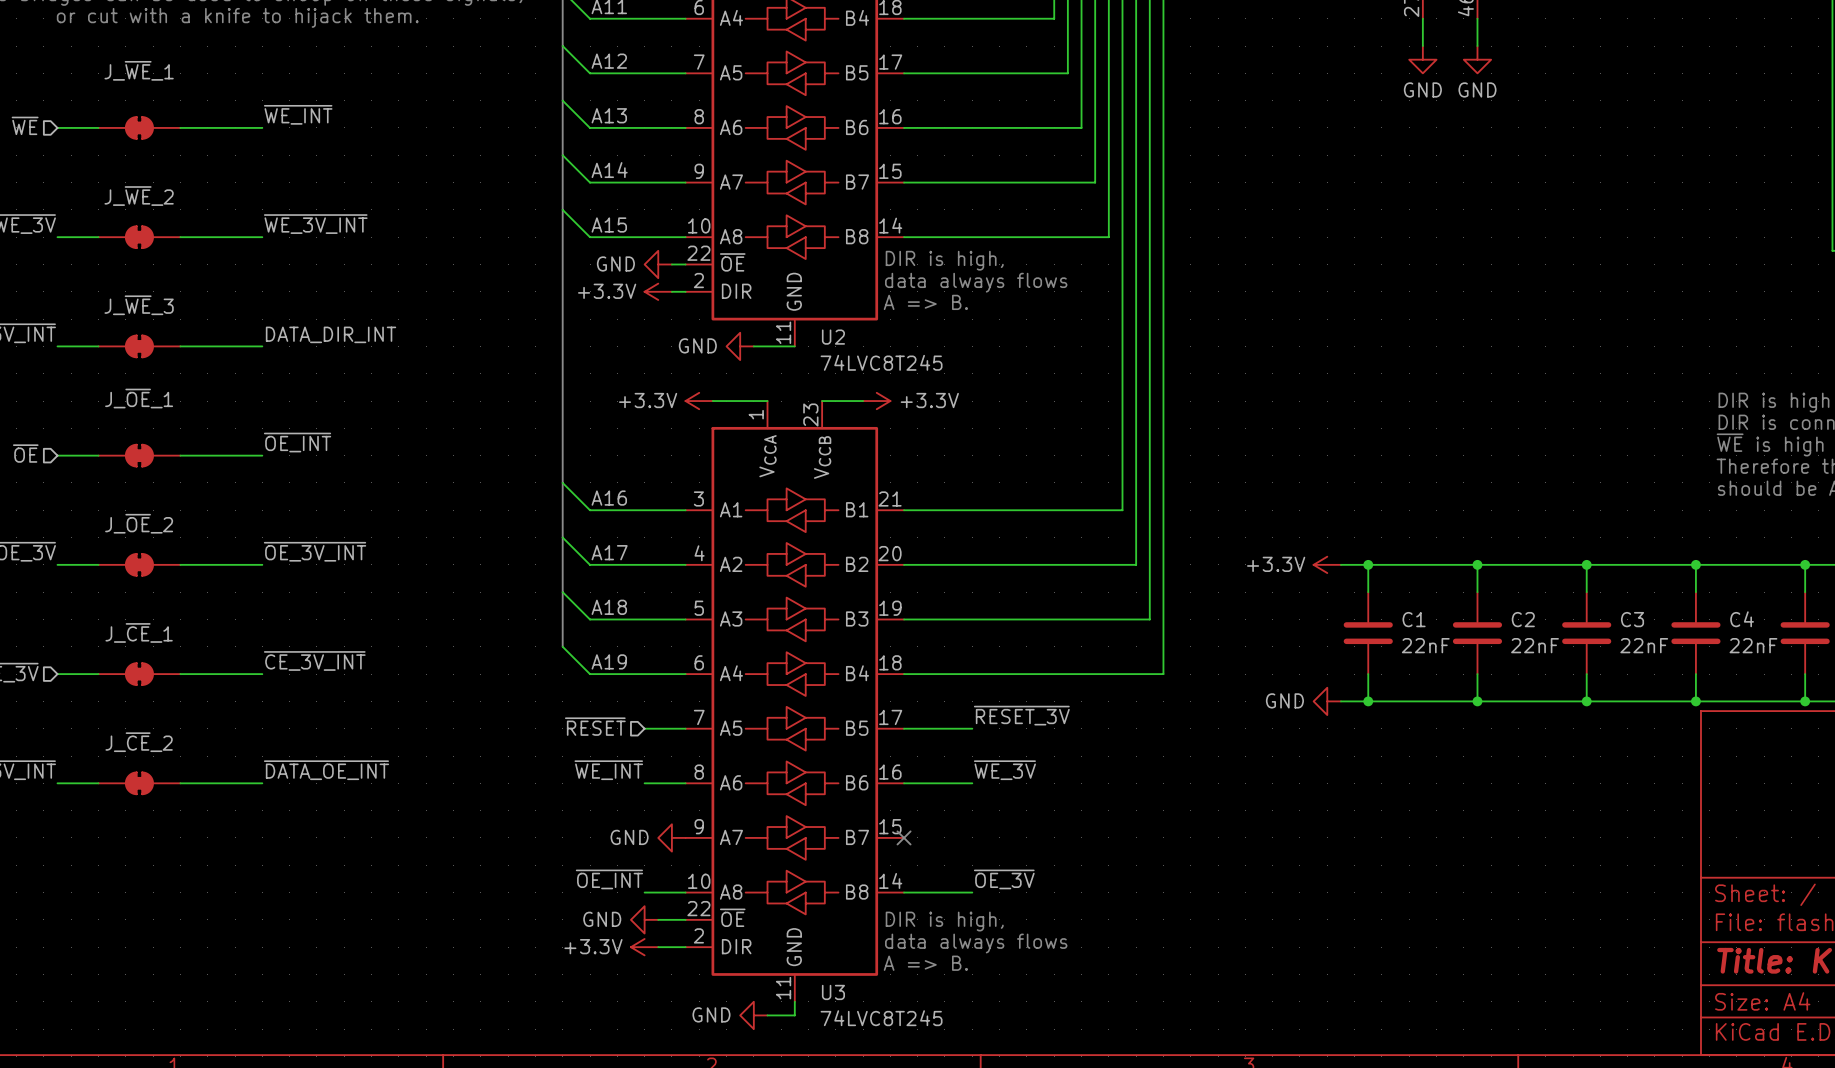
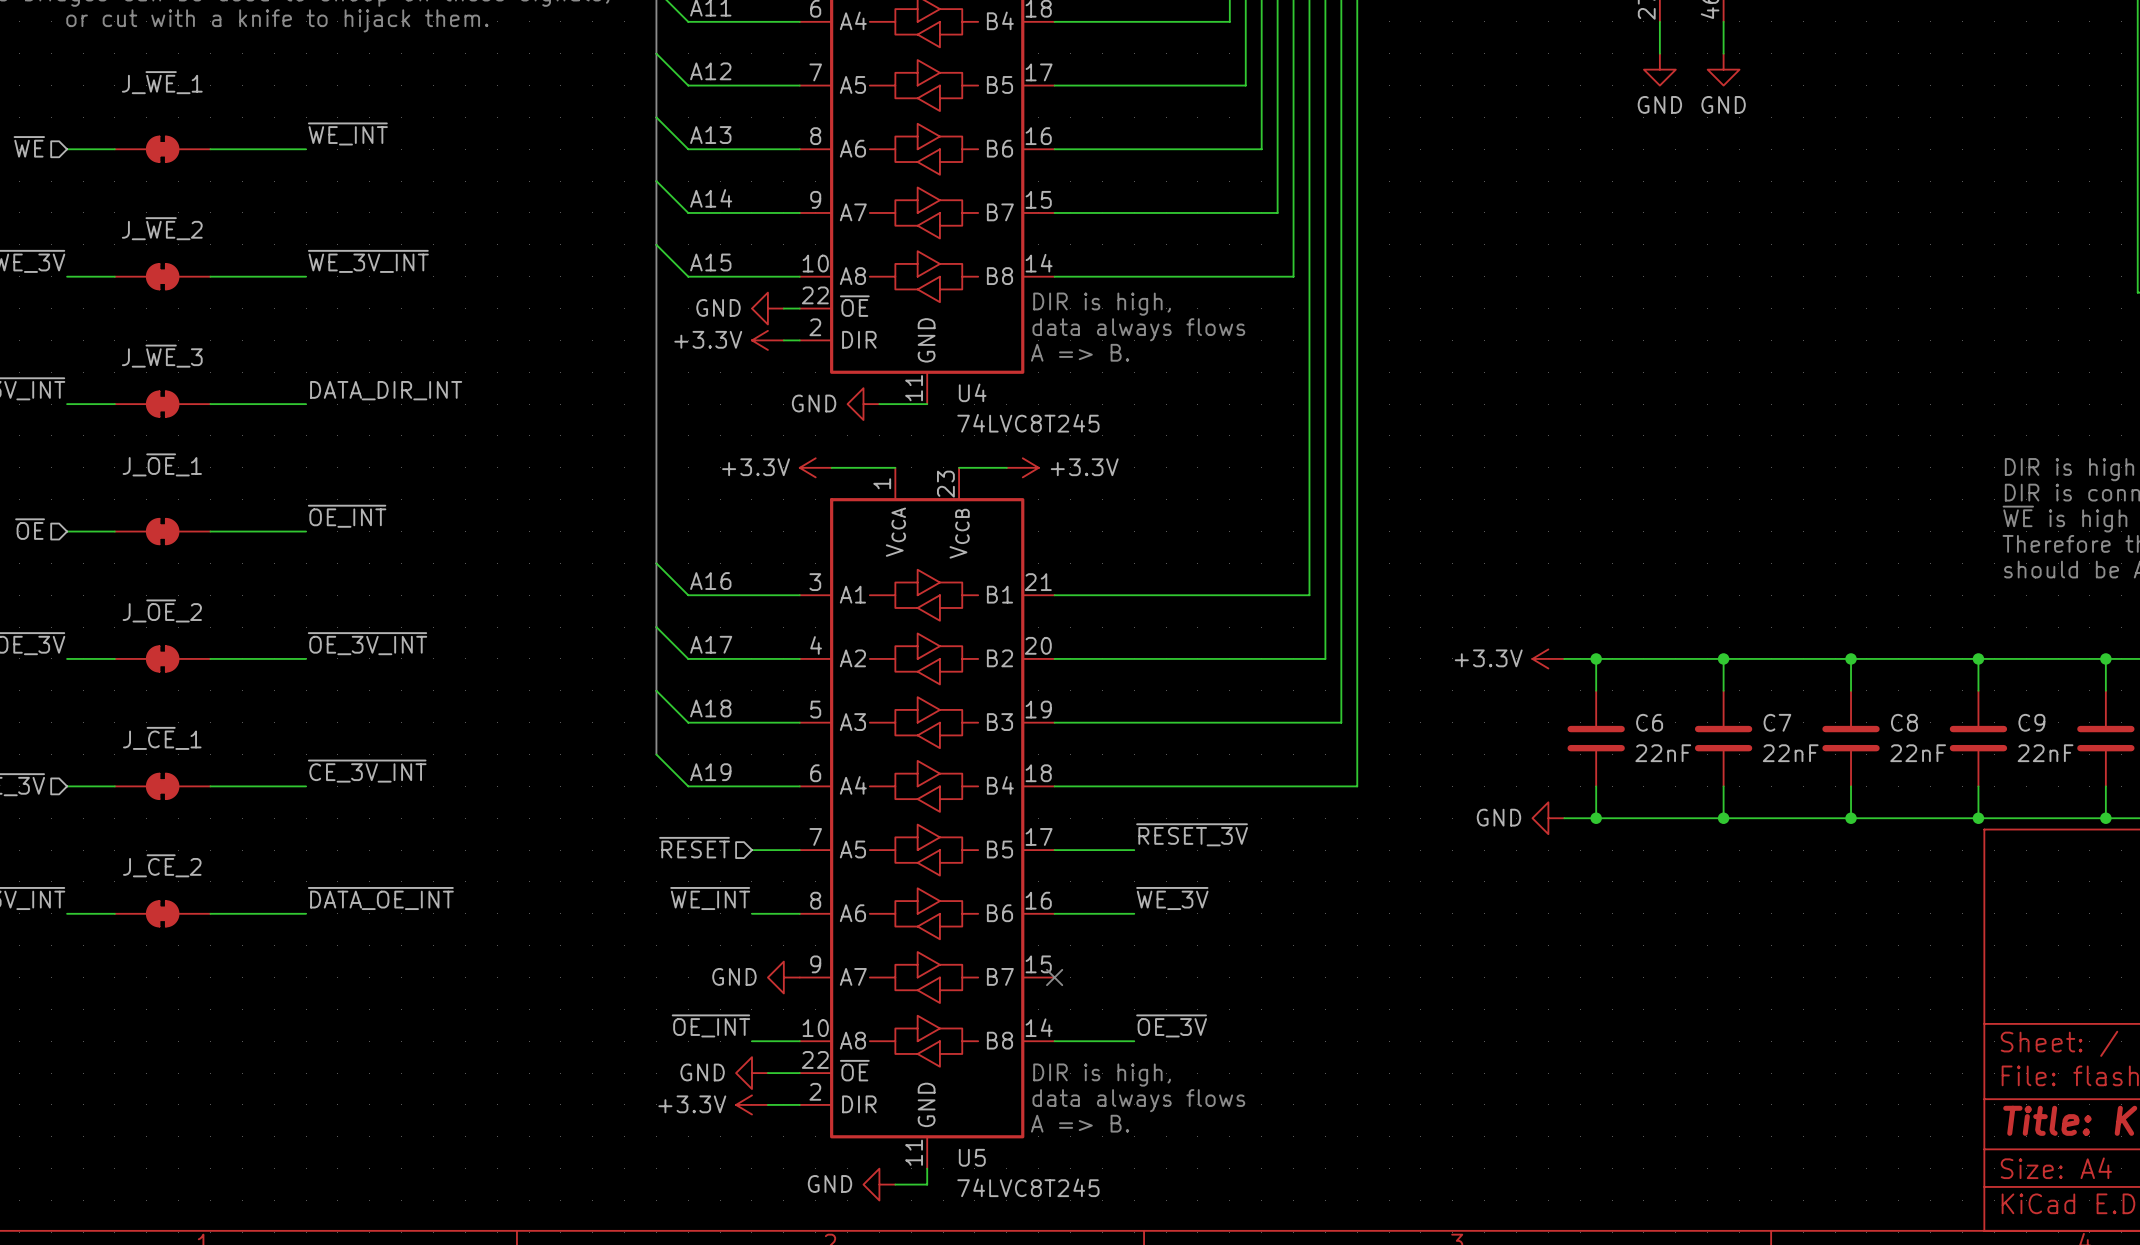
U2 name: U2 (833, 337) -> U4 (972, 392)
C1 name: C1 (1414, 619) -> C6 (1649, 722)
C2 name: C2 (1523, 619) -> C7 (1777, 722)
C3 name: C3 (1632, 619) -> C8 (1904, 722)
C4 name: C4 (1742, 619) -> C9 (2031, 722)
U3 name: U3 (833, 992) -> U5 (972, 1157)

